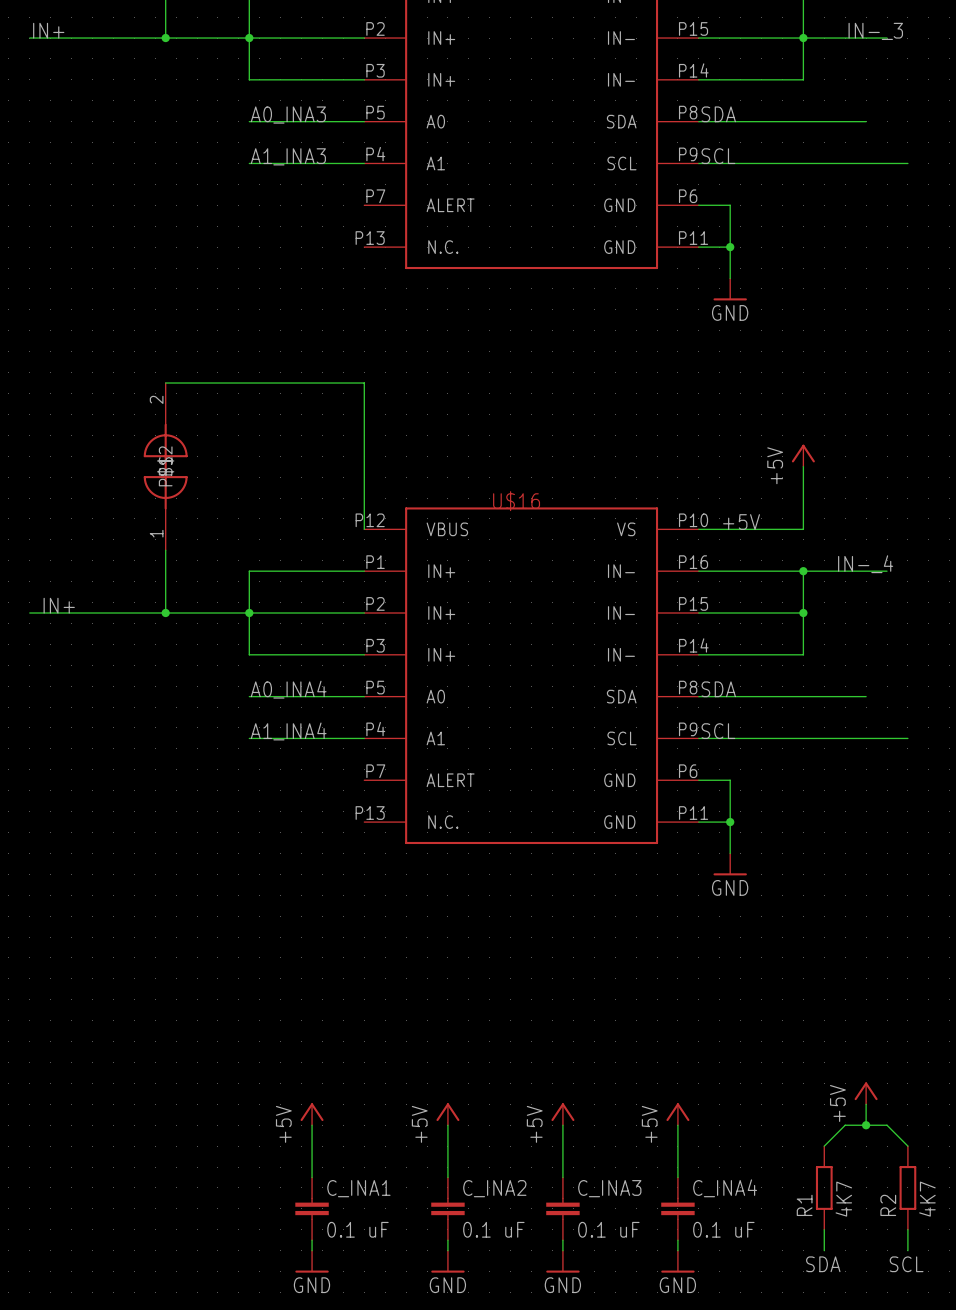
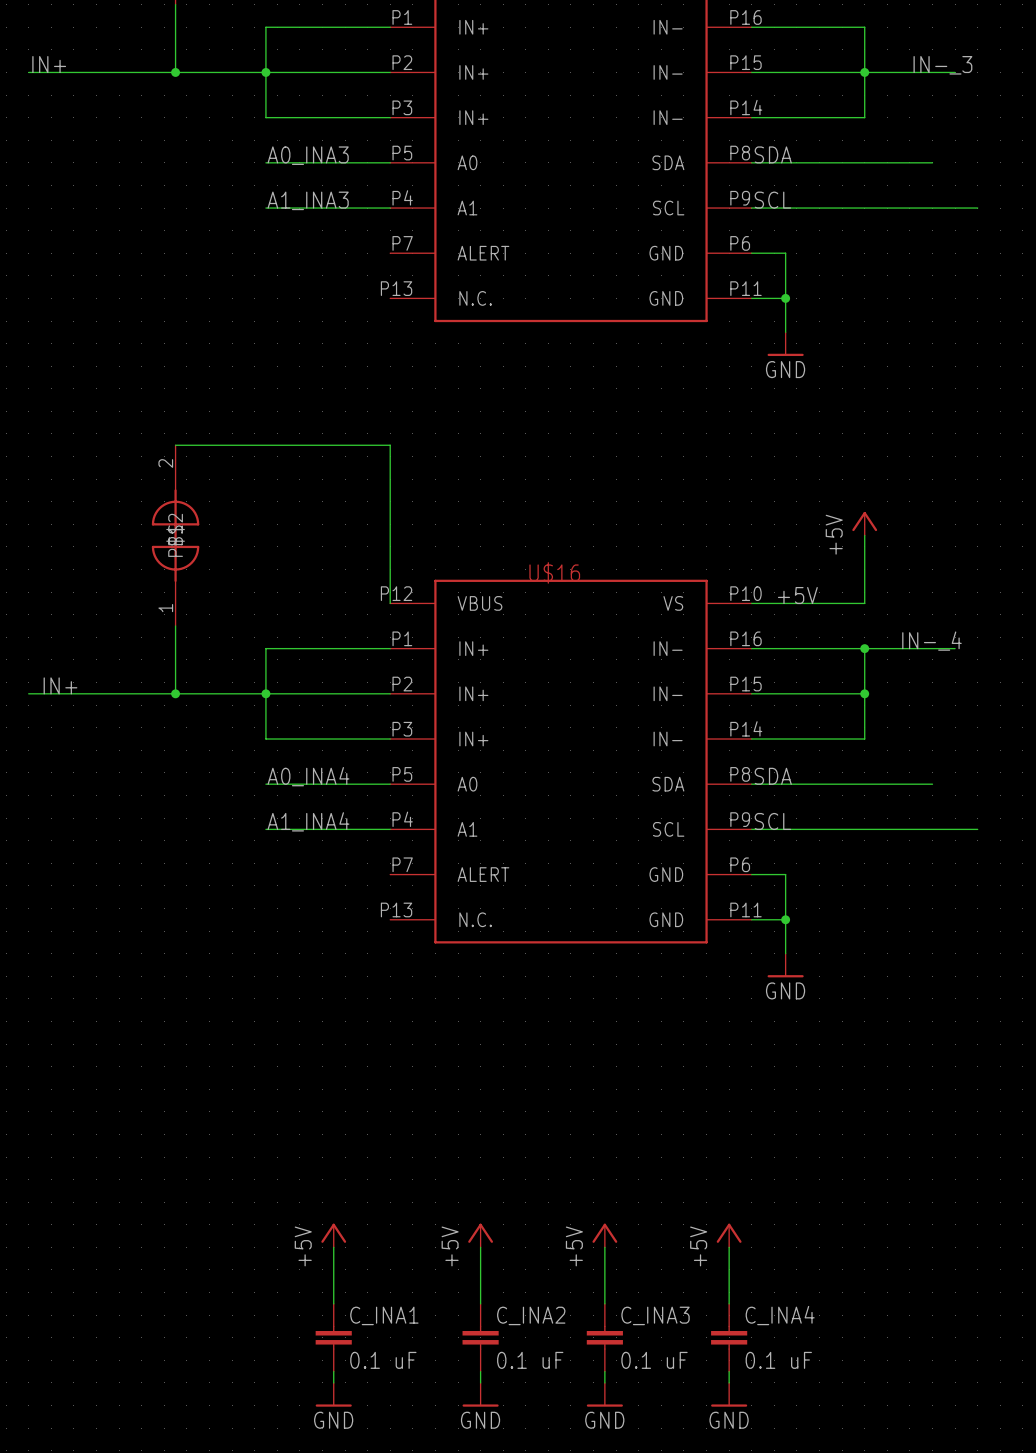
power symbol: +5V (866, 1093) -> none
wire: (866, 1104) (866, 1125) -> none
junction: (866, 1125) -> none
wire: (824, 1146) (845, 1125) (887, 1125) (907, 1146) -> none
R1: 4K7 (824, 1187) -> none
R2: 4K7 (907, 1187) -> none
wire: (824, 1229) (824, 1250) -> none
wire: (907, 1229) (907, 1250) -> none
label: SDA (823, 1264) -> none
label: SCL (906, 1264) -> none

